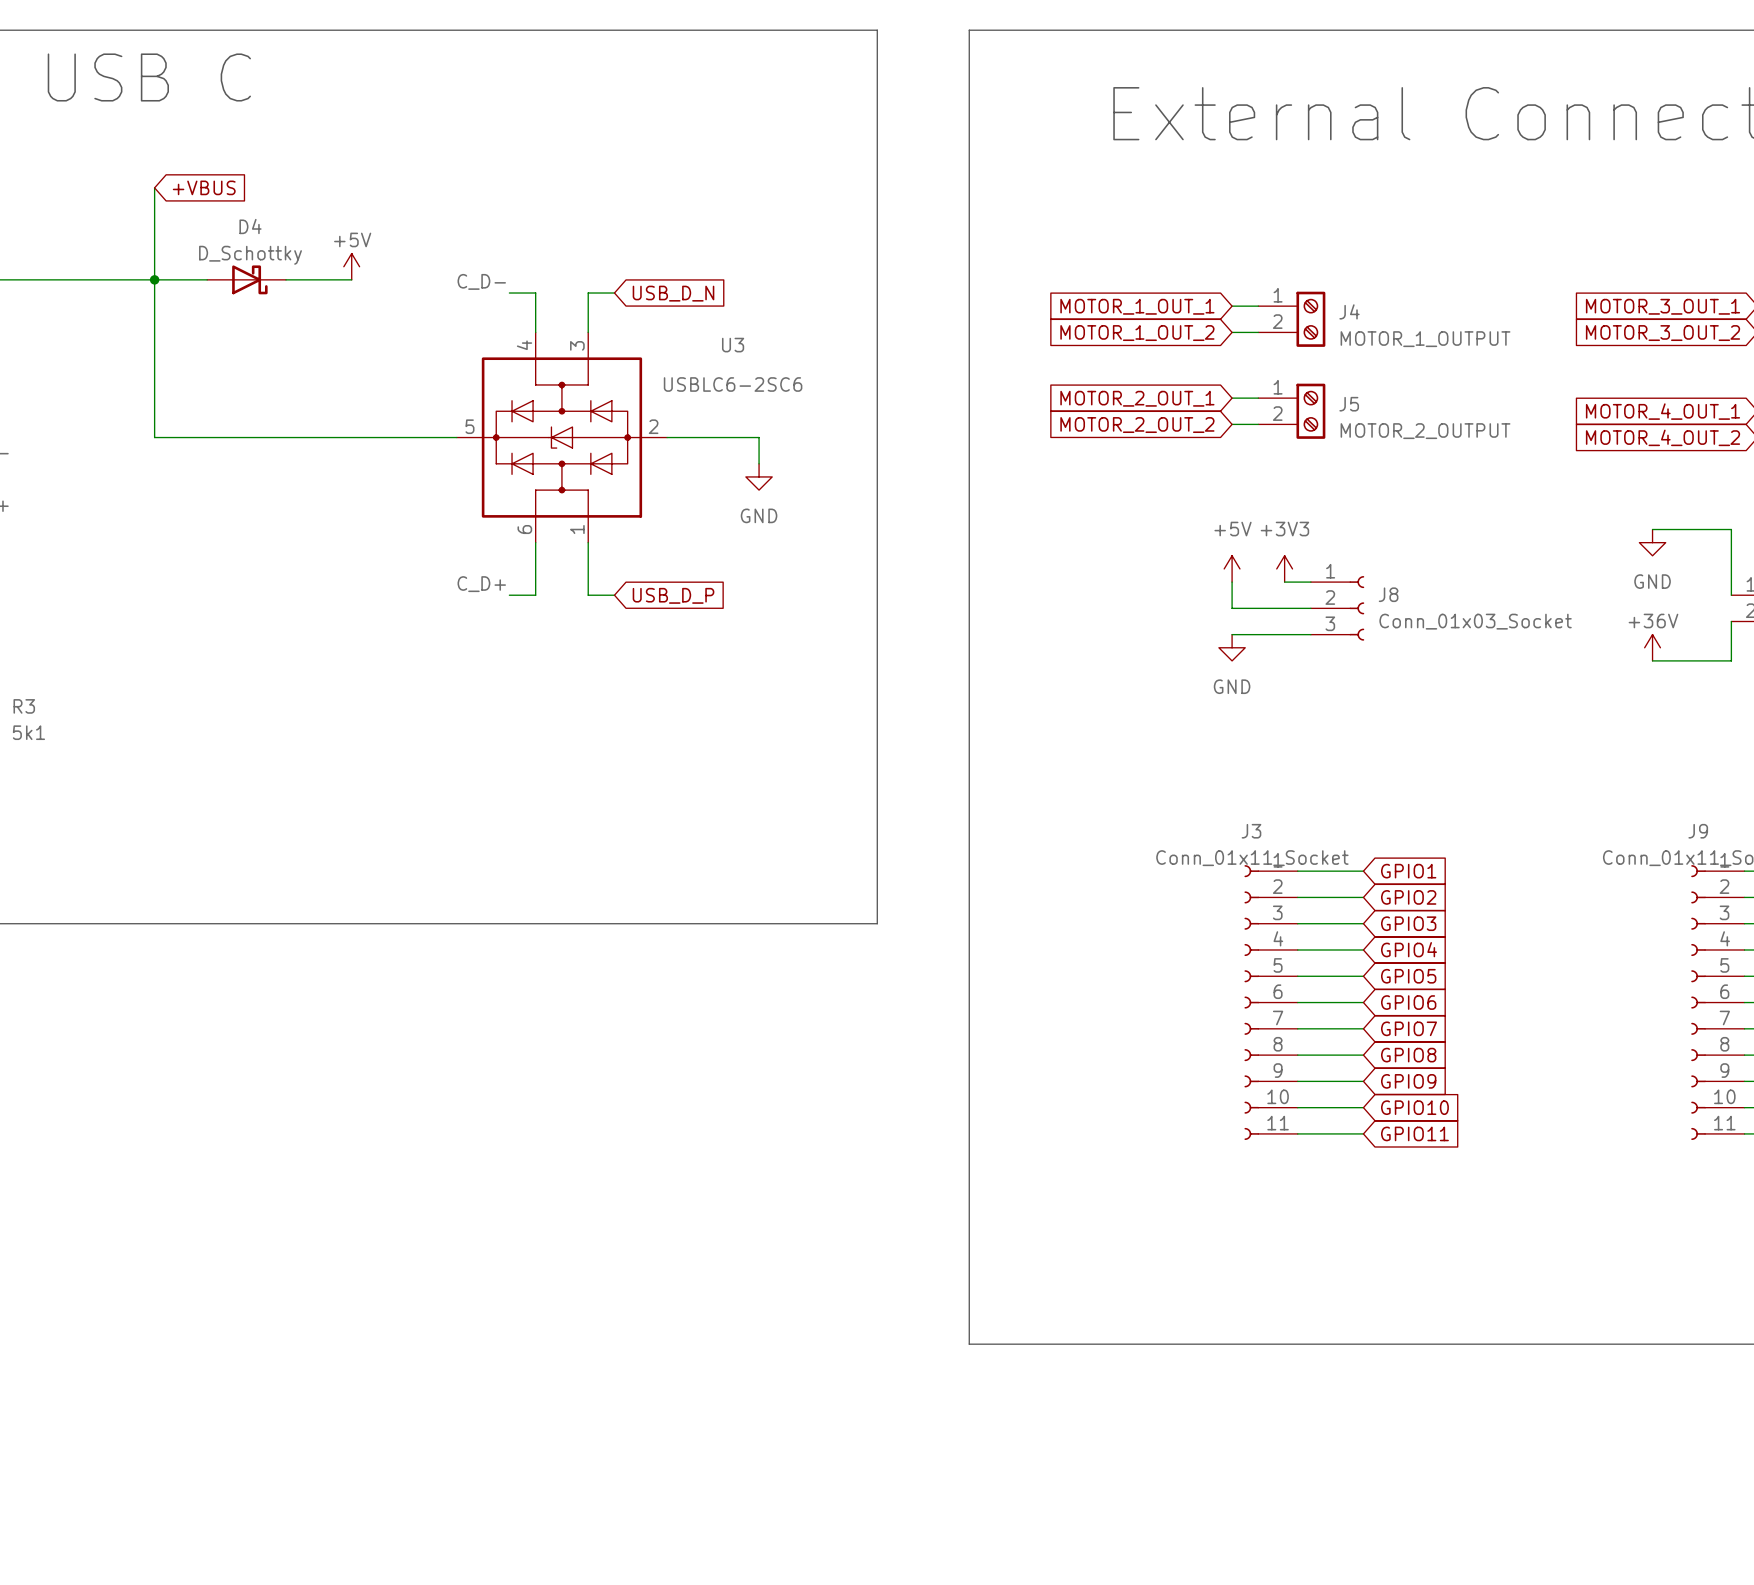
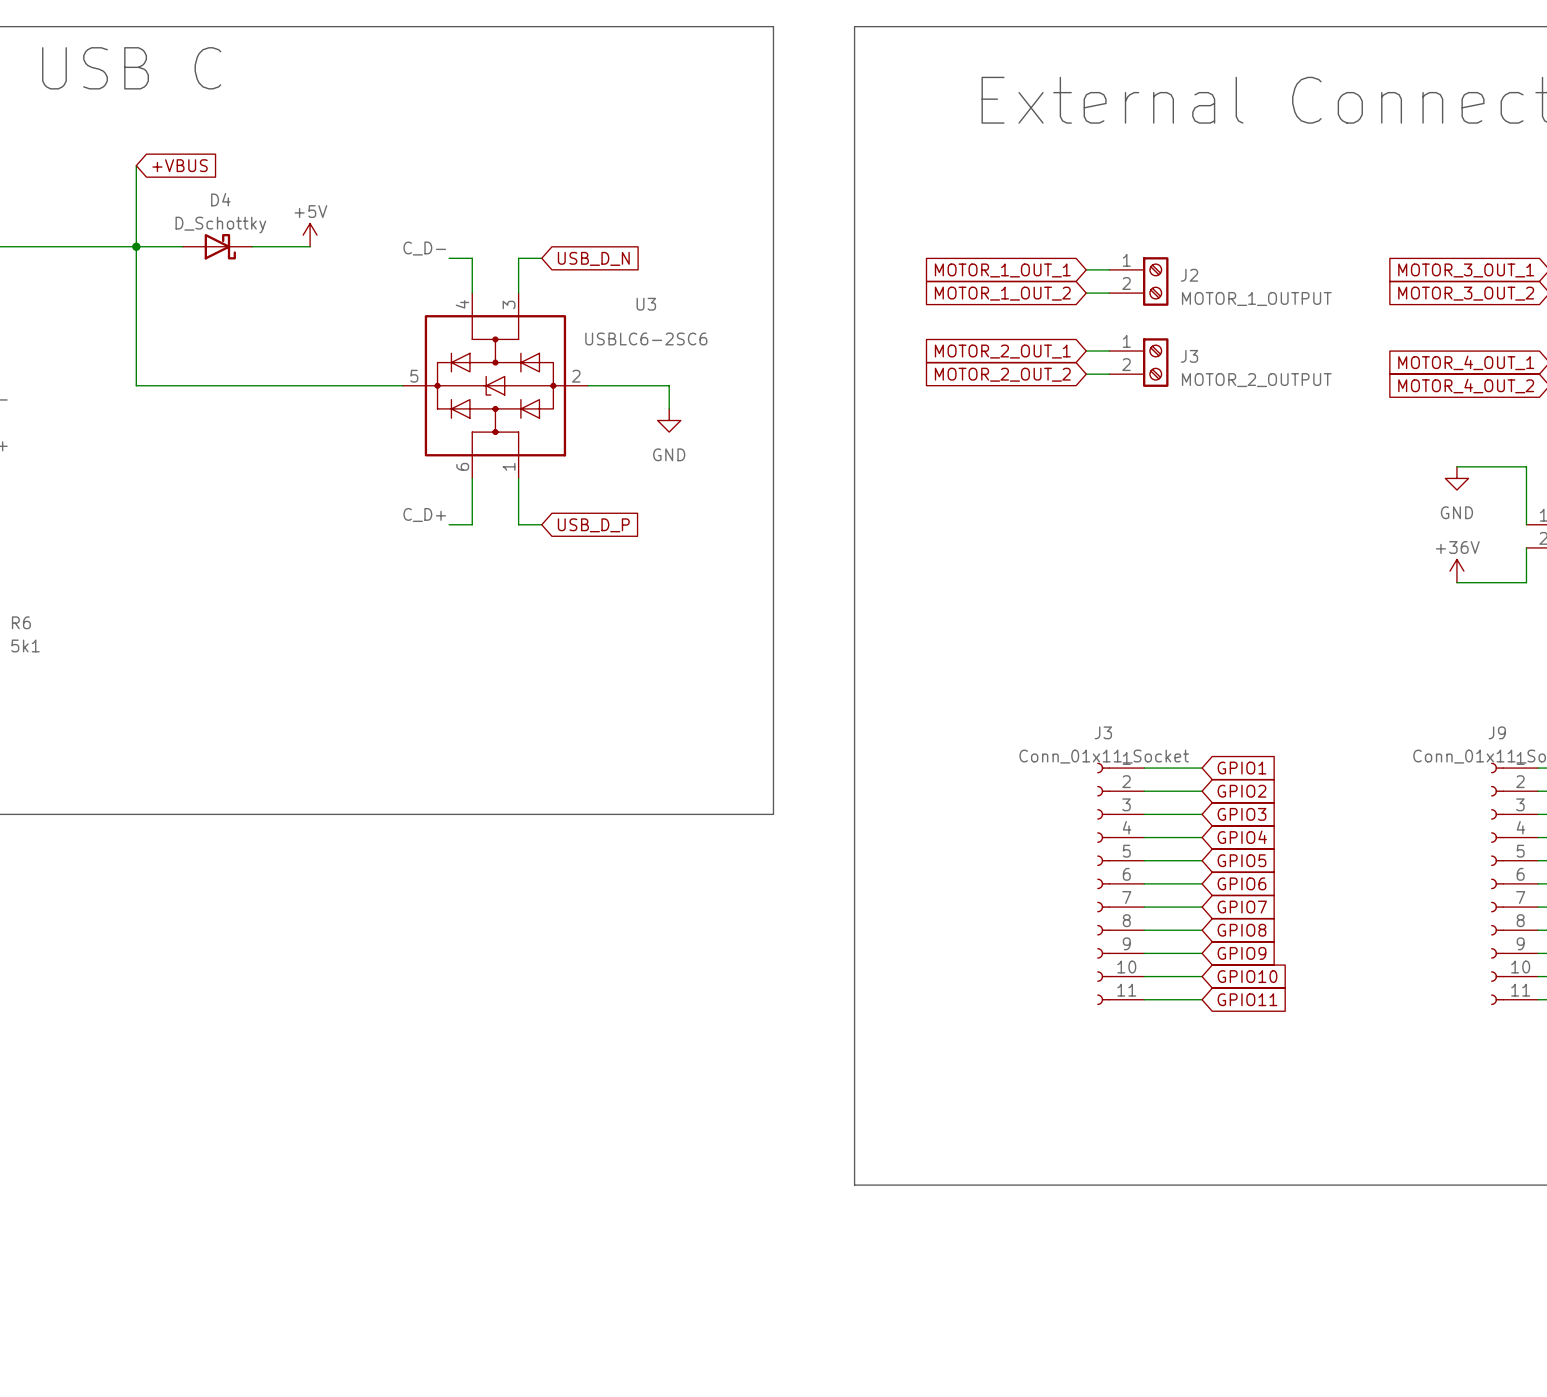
J4 name: J4 (1349, 311) -> J2 (1189, 275)
J5 name: J5 (1349, 404) -> J3 (1189, 356)
power symbol: +5V (1232, 568) -> none
power symbol: +3V3 (1284, 568) -> none
wire: (1232, 582) (1232, 608) (1310, 608) -> none
wire: (1284, 582) (1310, 582) -> none
J8: Conn_01x03_Socket (1337, 608) -> none
wire: (1232, 634) (1310, 634) -> none
power symbol: GND (1232, 647) -> none
R3 name: R3 (24, 706) -> R6 (21, 622)

